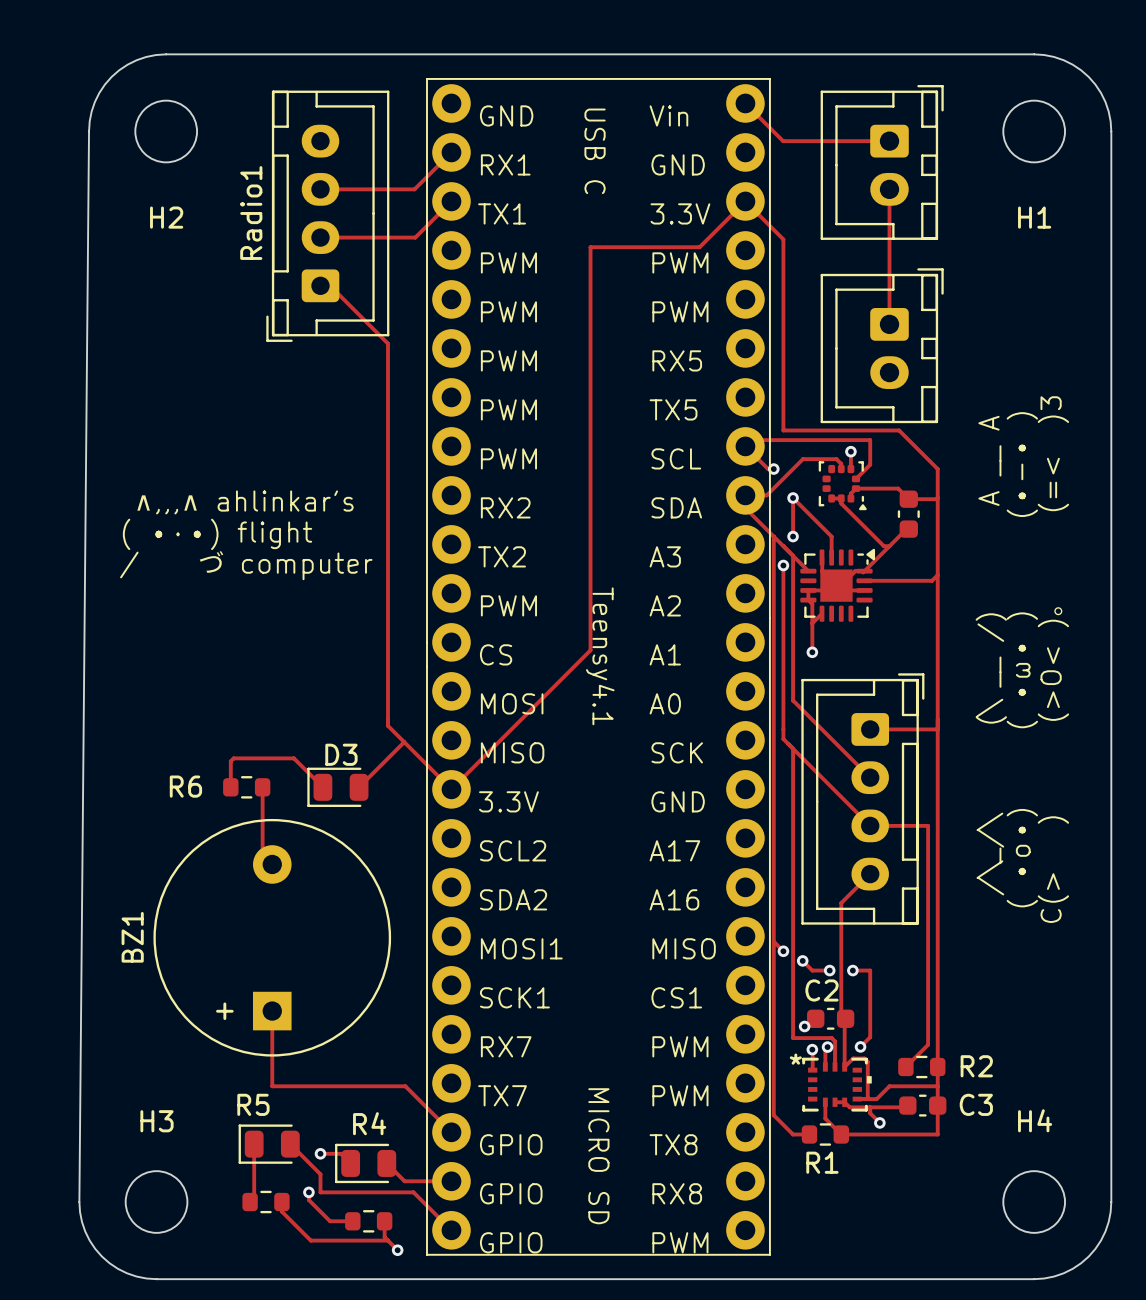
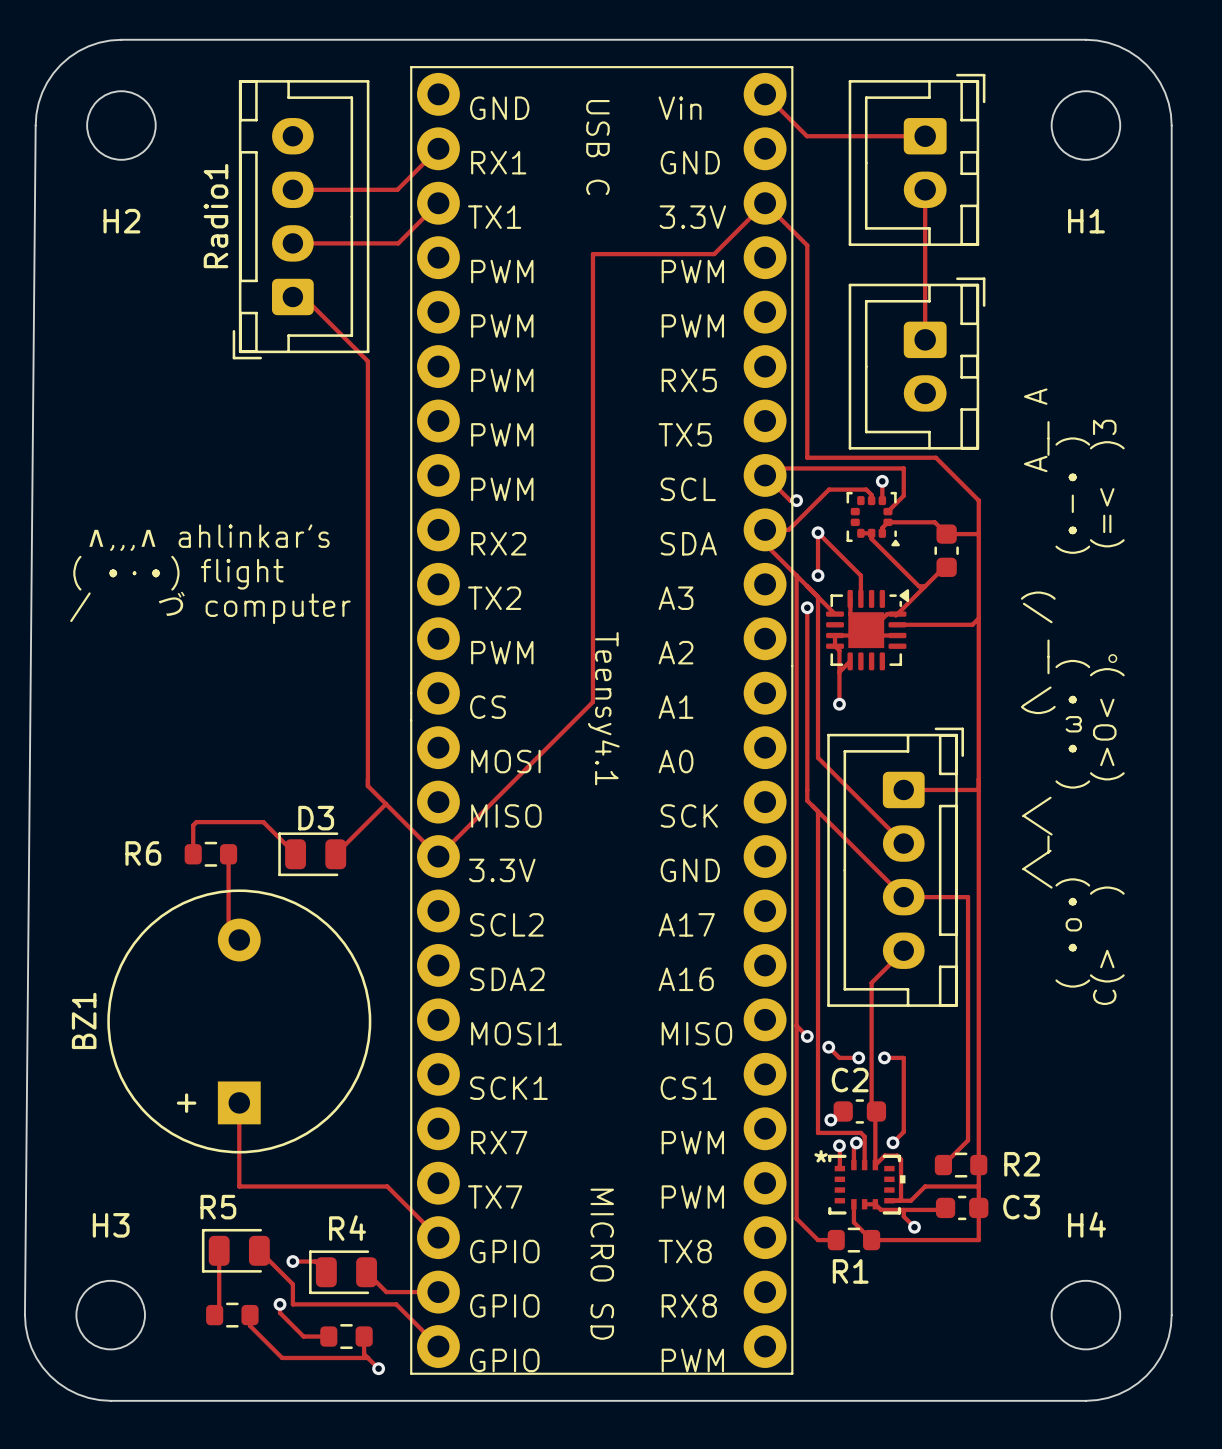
text: /\_/\ (\ __ /) A __ A (991, 655) -> /\_/\ (\ __ /) A__ A (1038, 638)

